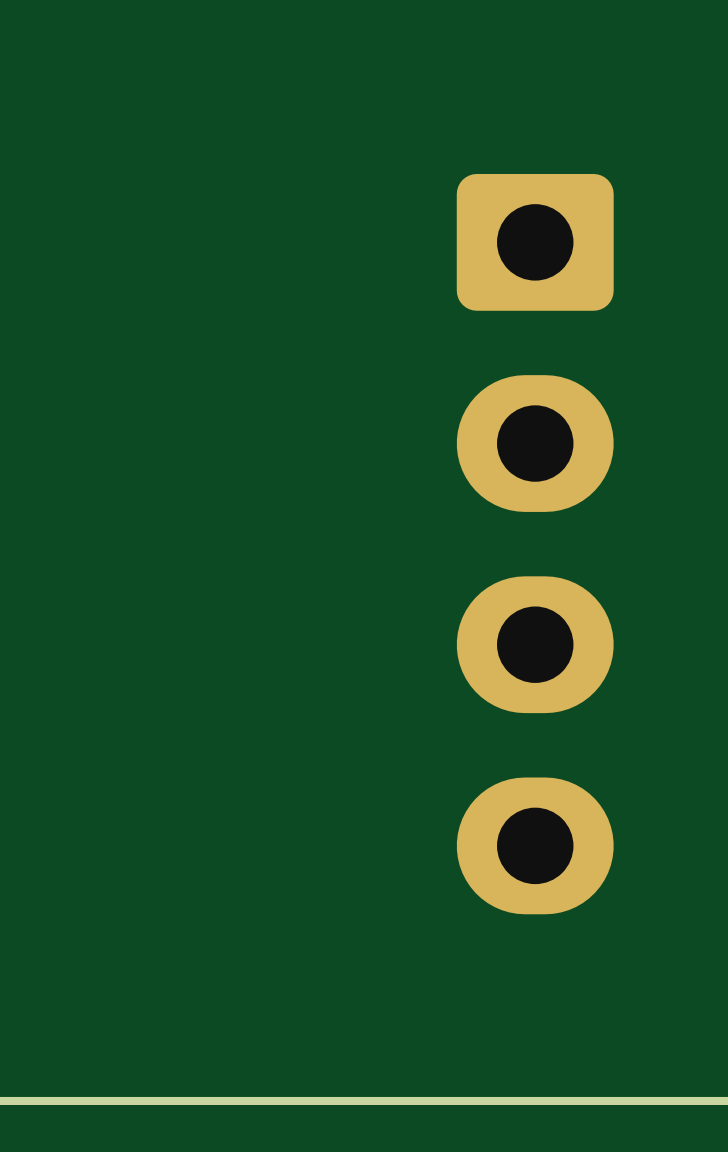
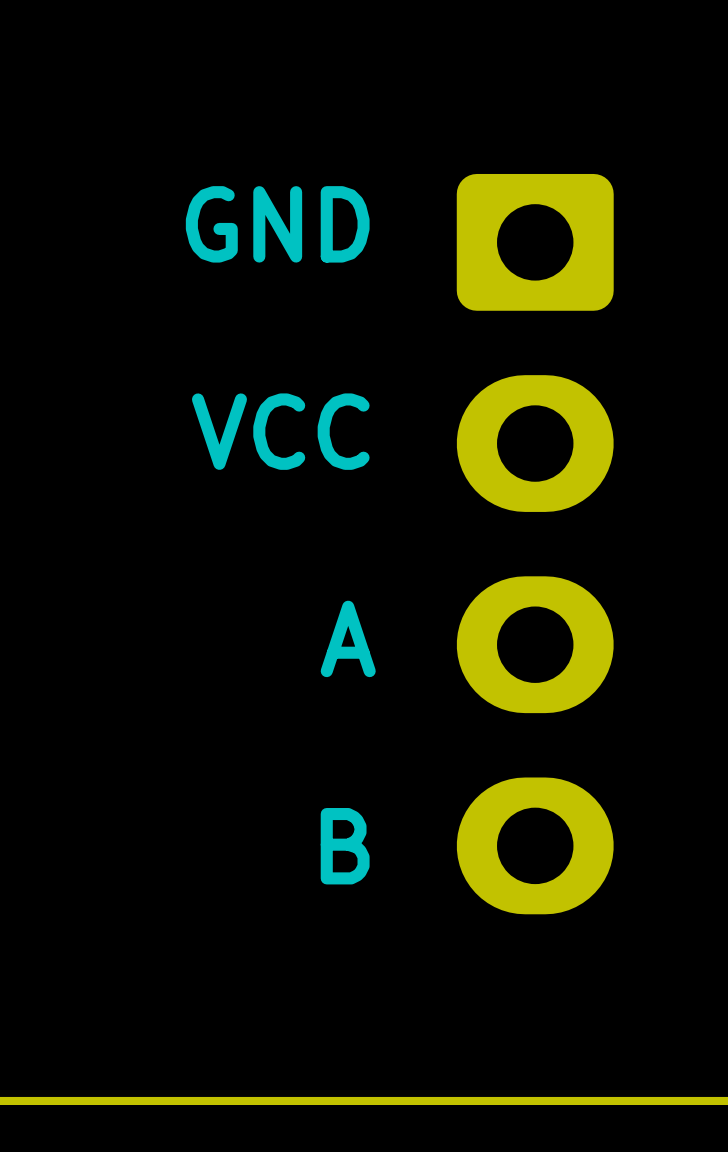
text: none -> GND (277, 224)
text: none -> VCC (280, 431)
text: none -> A (348, 638)
text: none -> B (345, 846)

